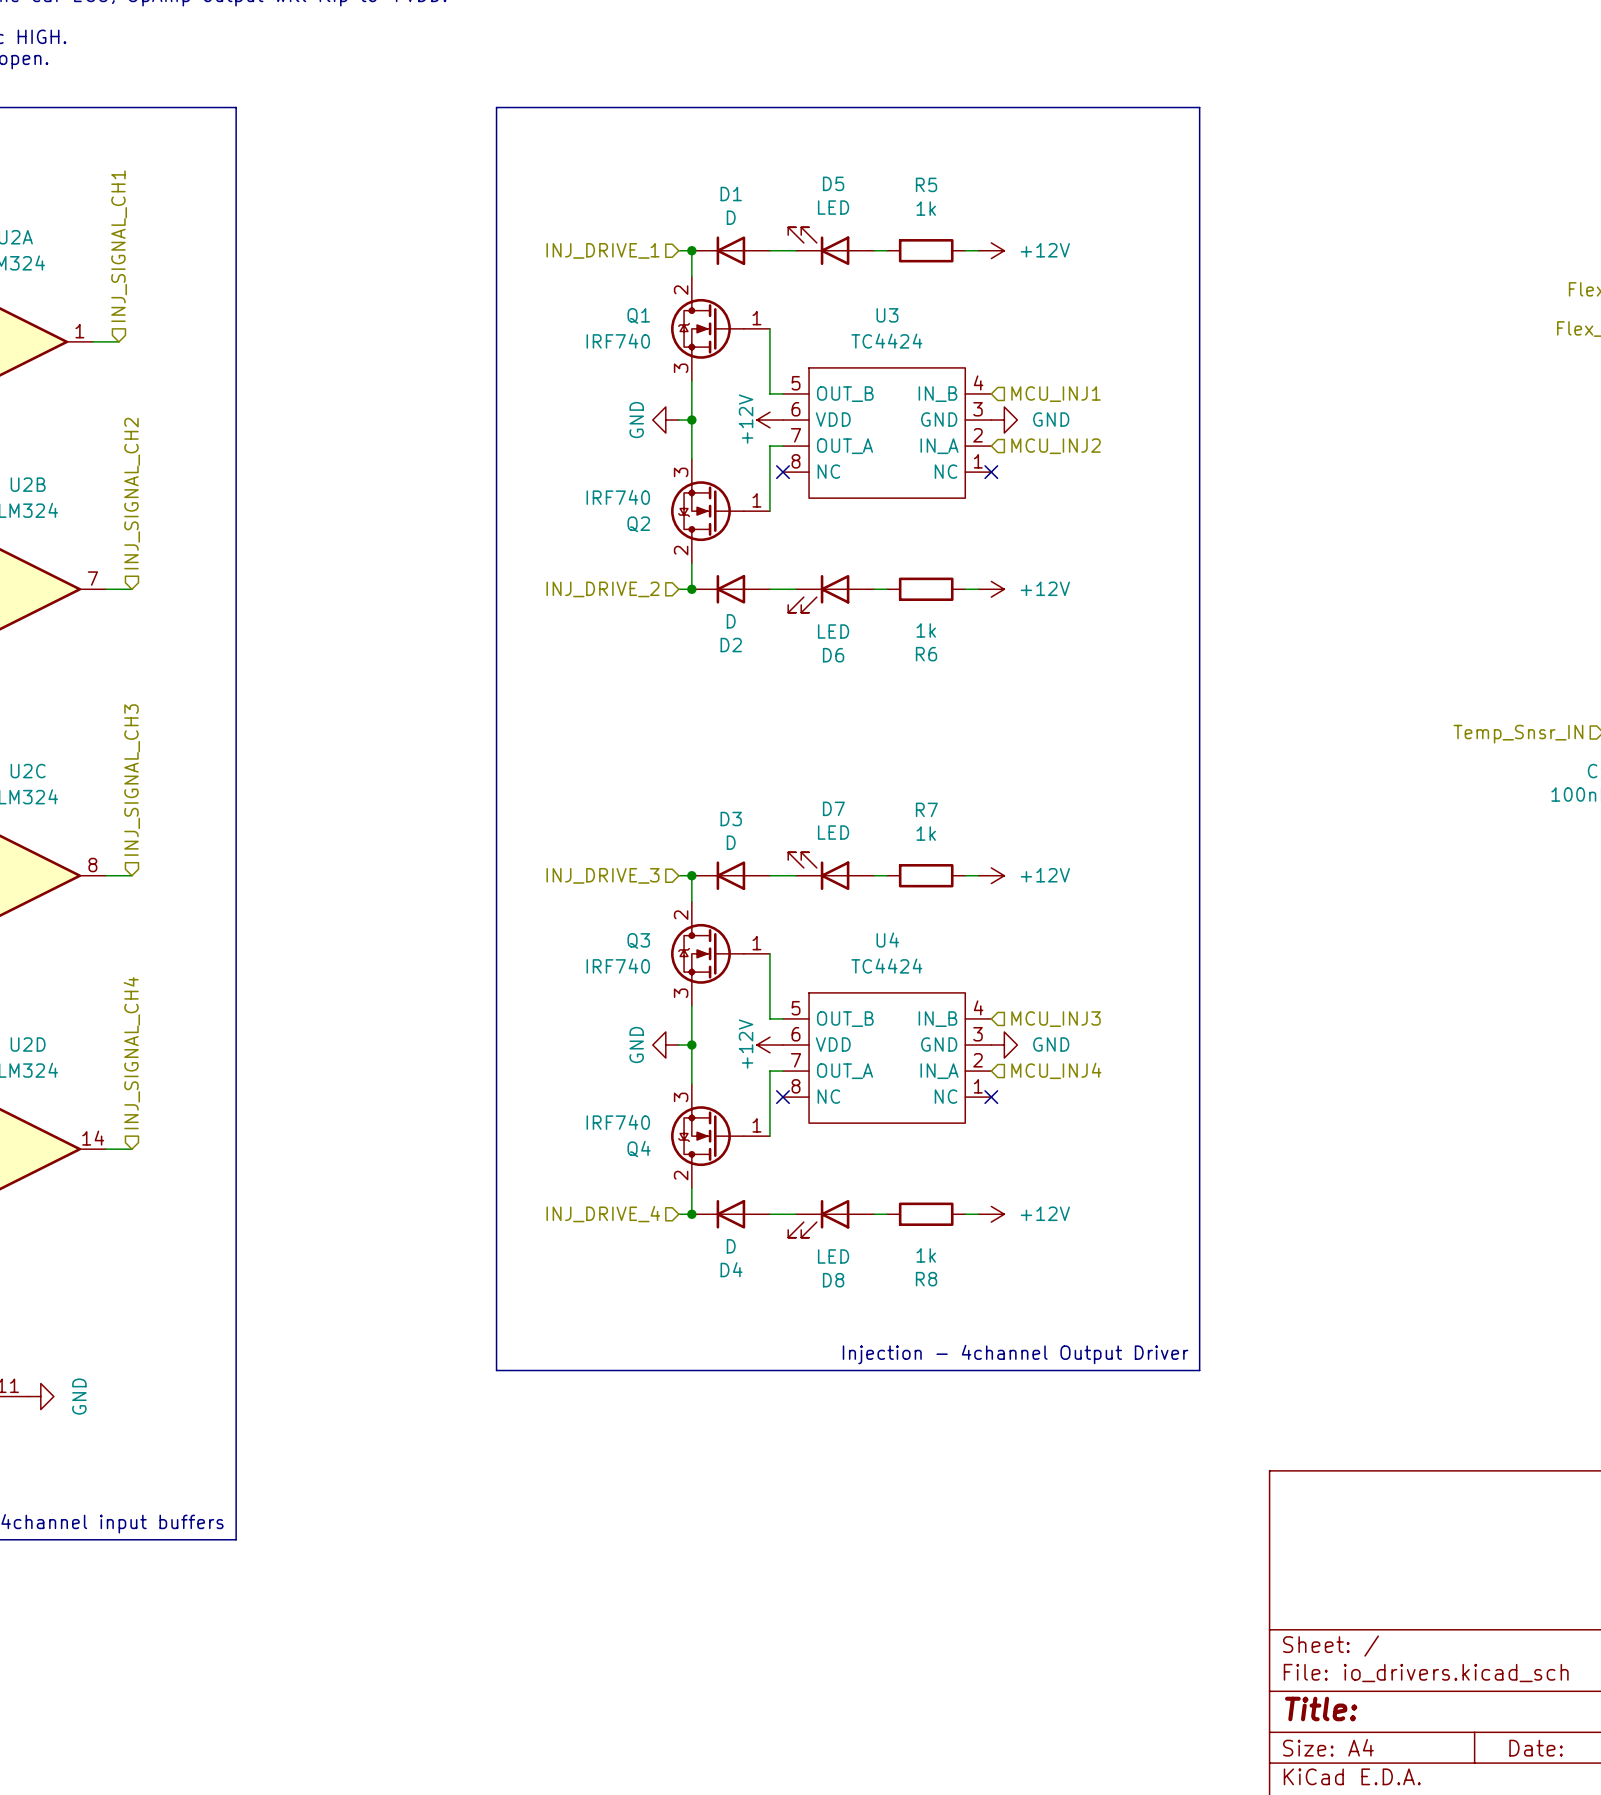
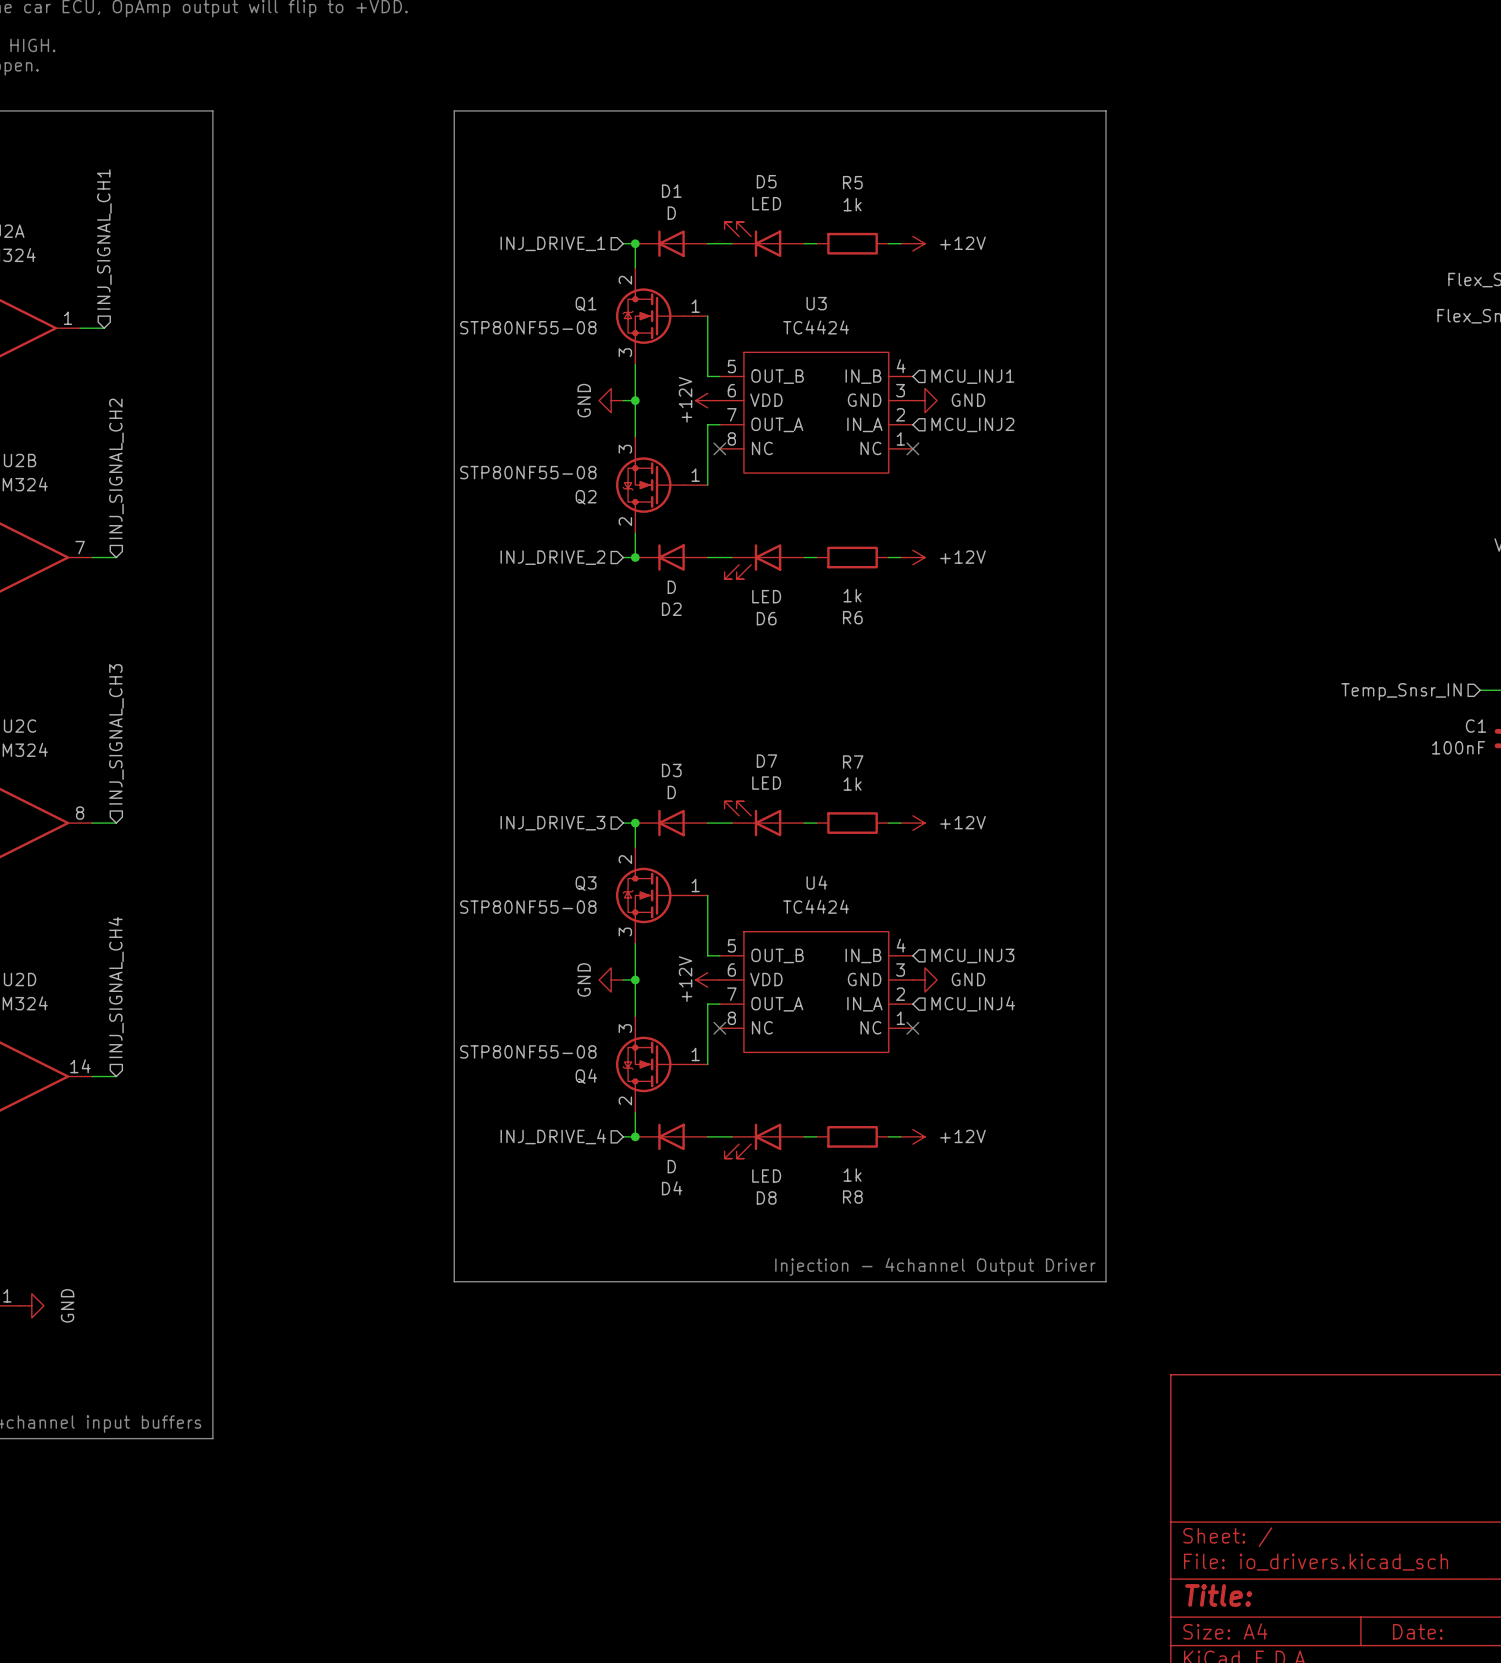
Q1 value: IRF740 (618, 341) -> STP80NF55-08 (528, 327)
Q2 value: IRF740 (618, 497) -> STP80NF55-08 (528, 472)
Q3 value: IRF740 (618, 966) -> STP80NF55-08 (528, 907)
Q4 value: IRF740 (618, 1122) -> STP80NF55-08 (528, 1051)

